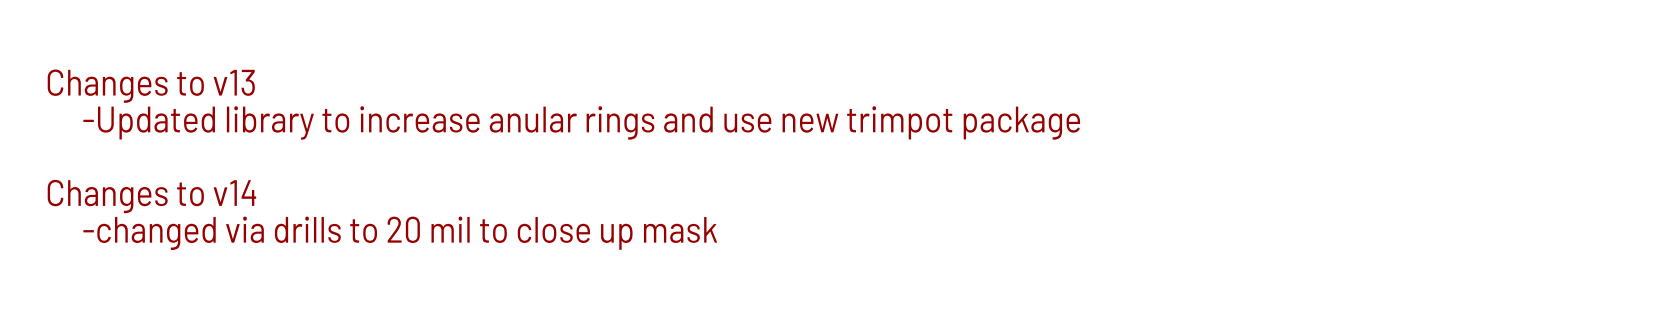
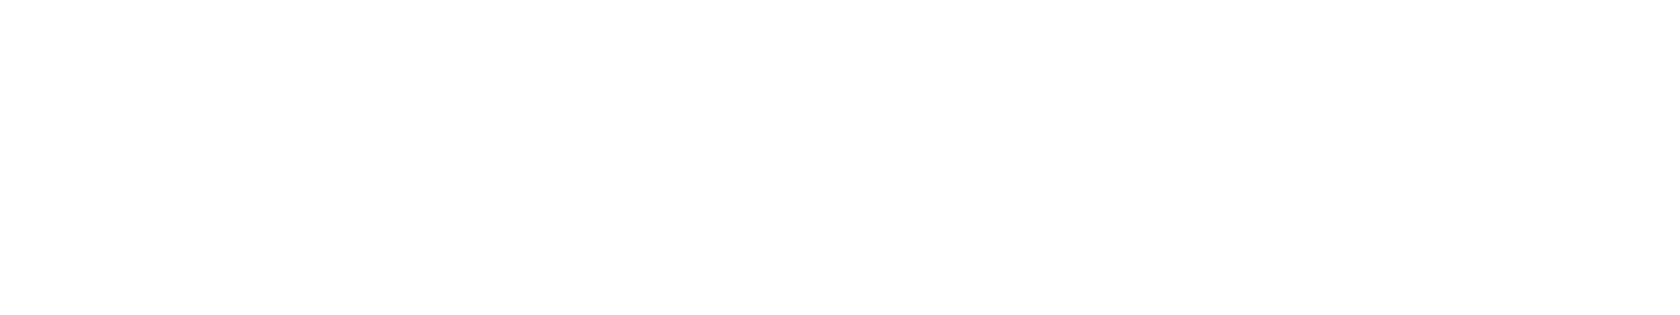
text: Changes to v13 (151, 86) -> none
text: -Updated library to increase anular rings and use new trimpot package (581, 122) -> none
text: Changes to v14 (151, 196) -> none
text: -changed via drills to 20 mil to close up mask (400, 233) -> none

